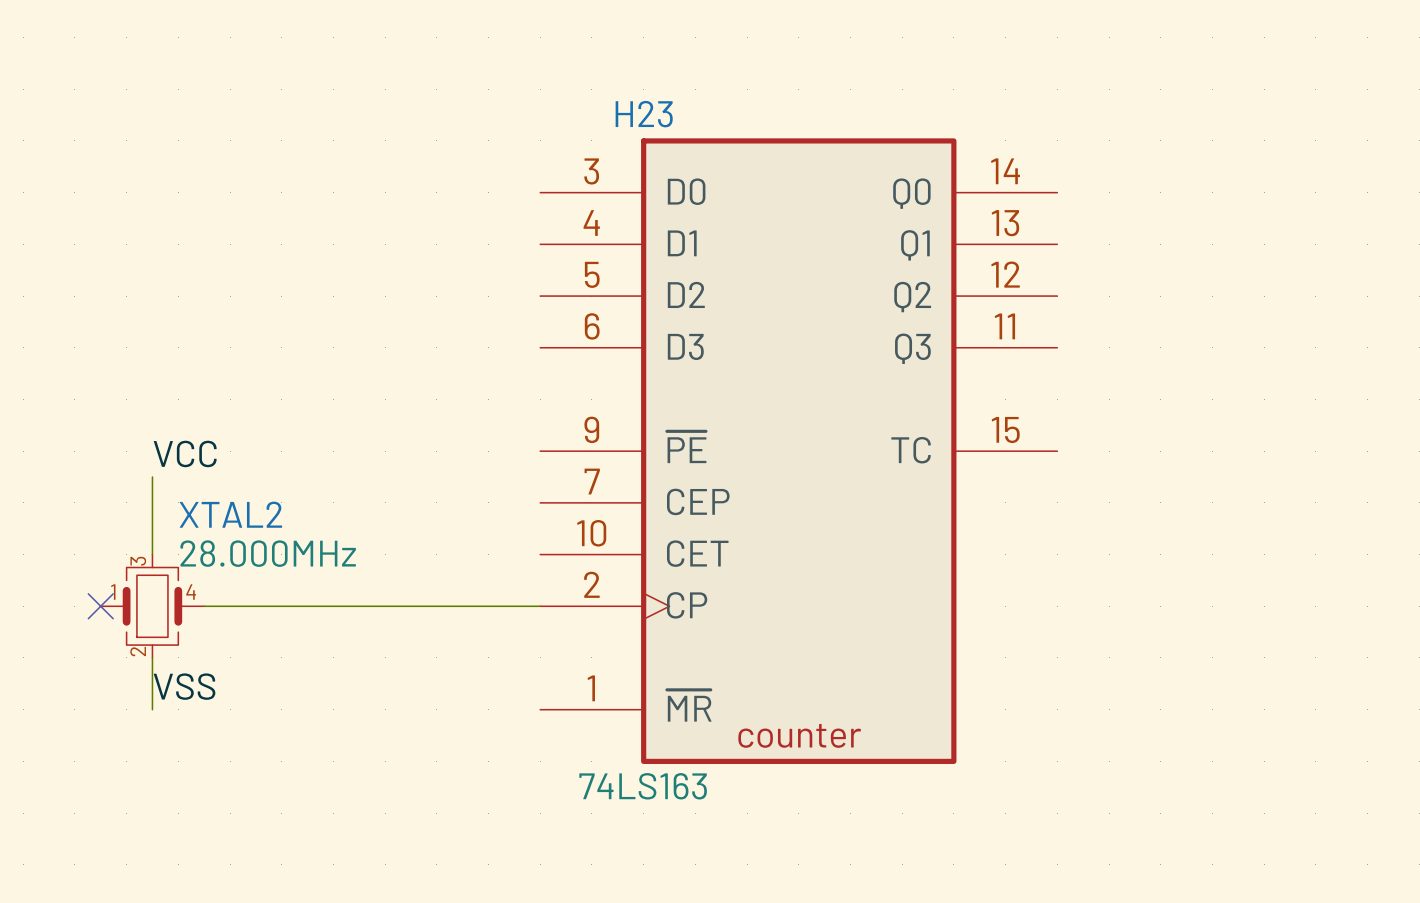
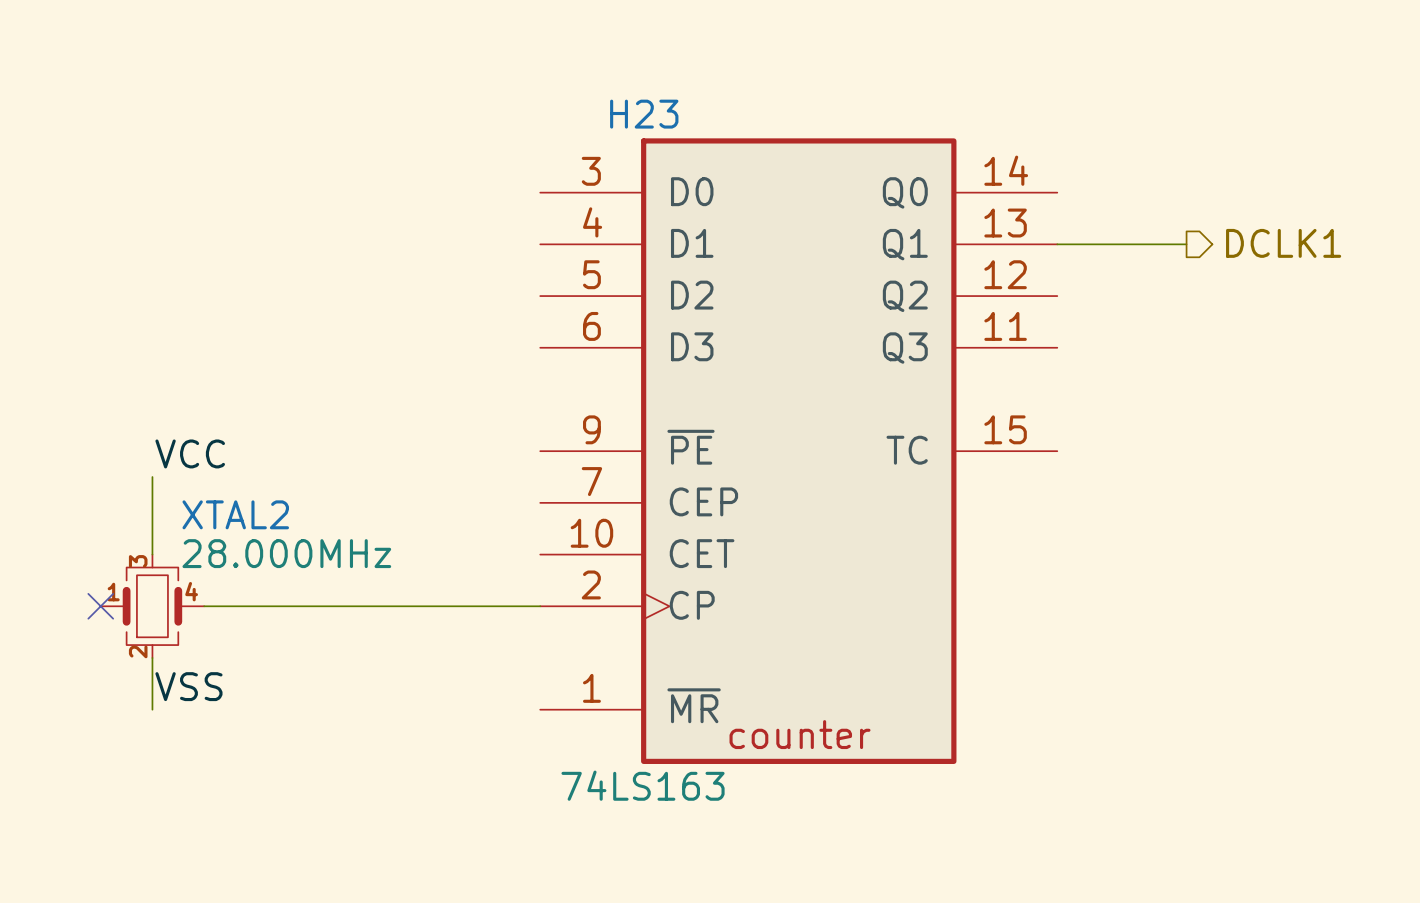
hierarchical label: none -> DCLK1 (1283, 243)
wire: none -> (1057, 244) (1186, 244)

